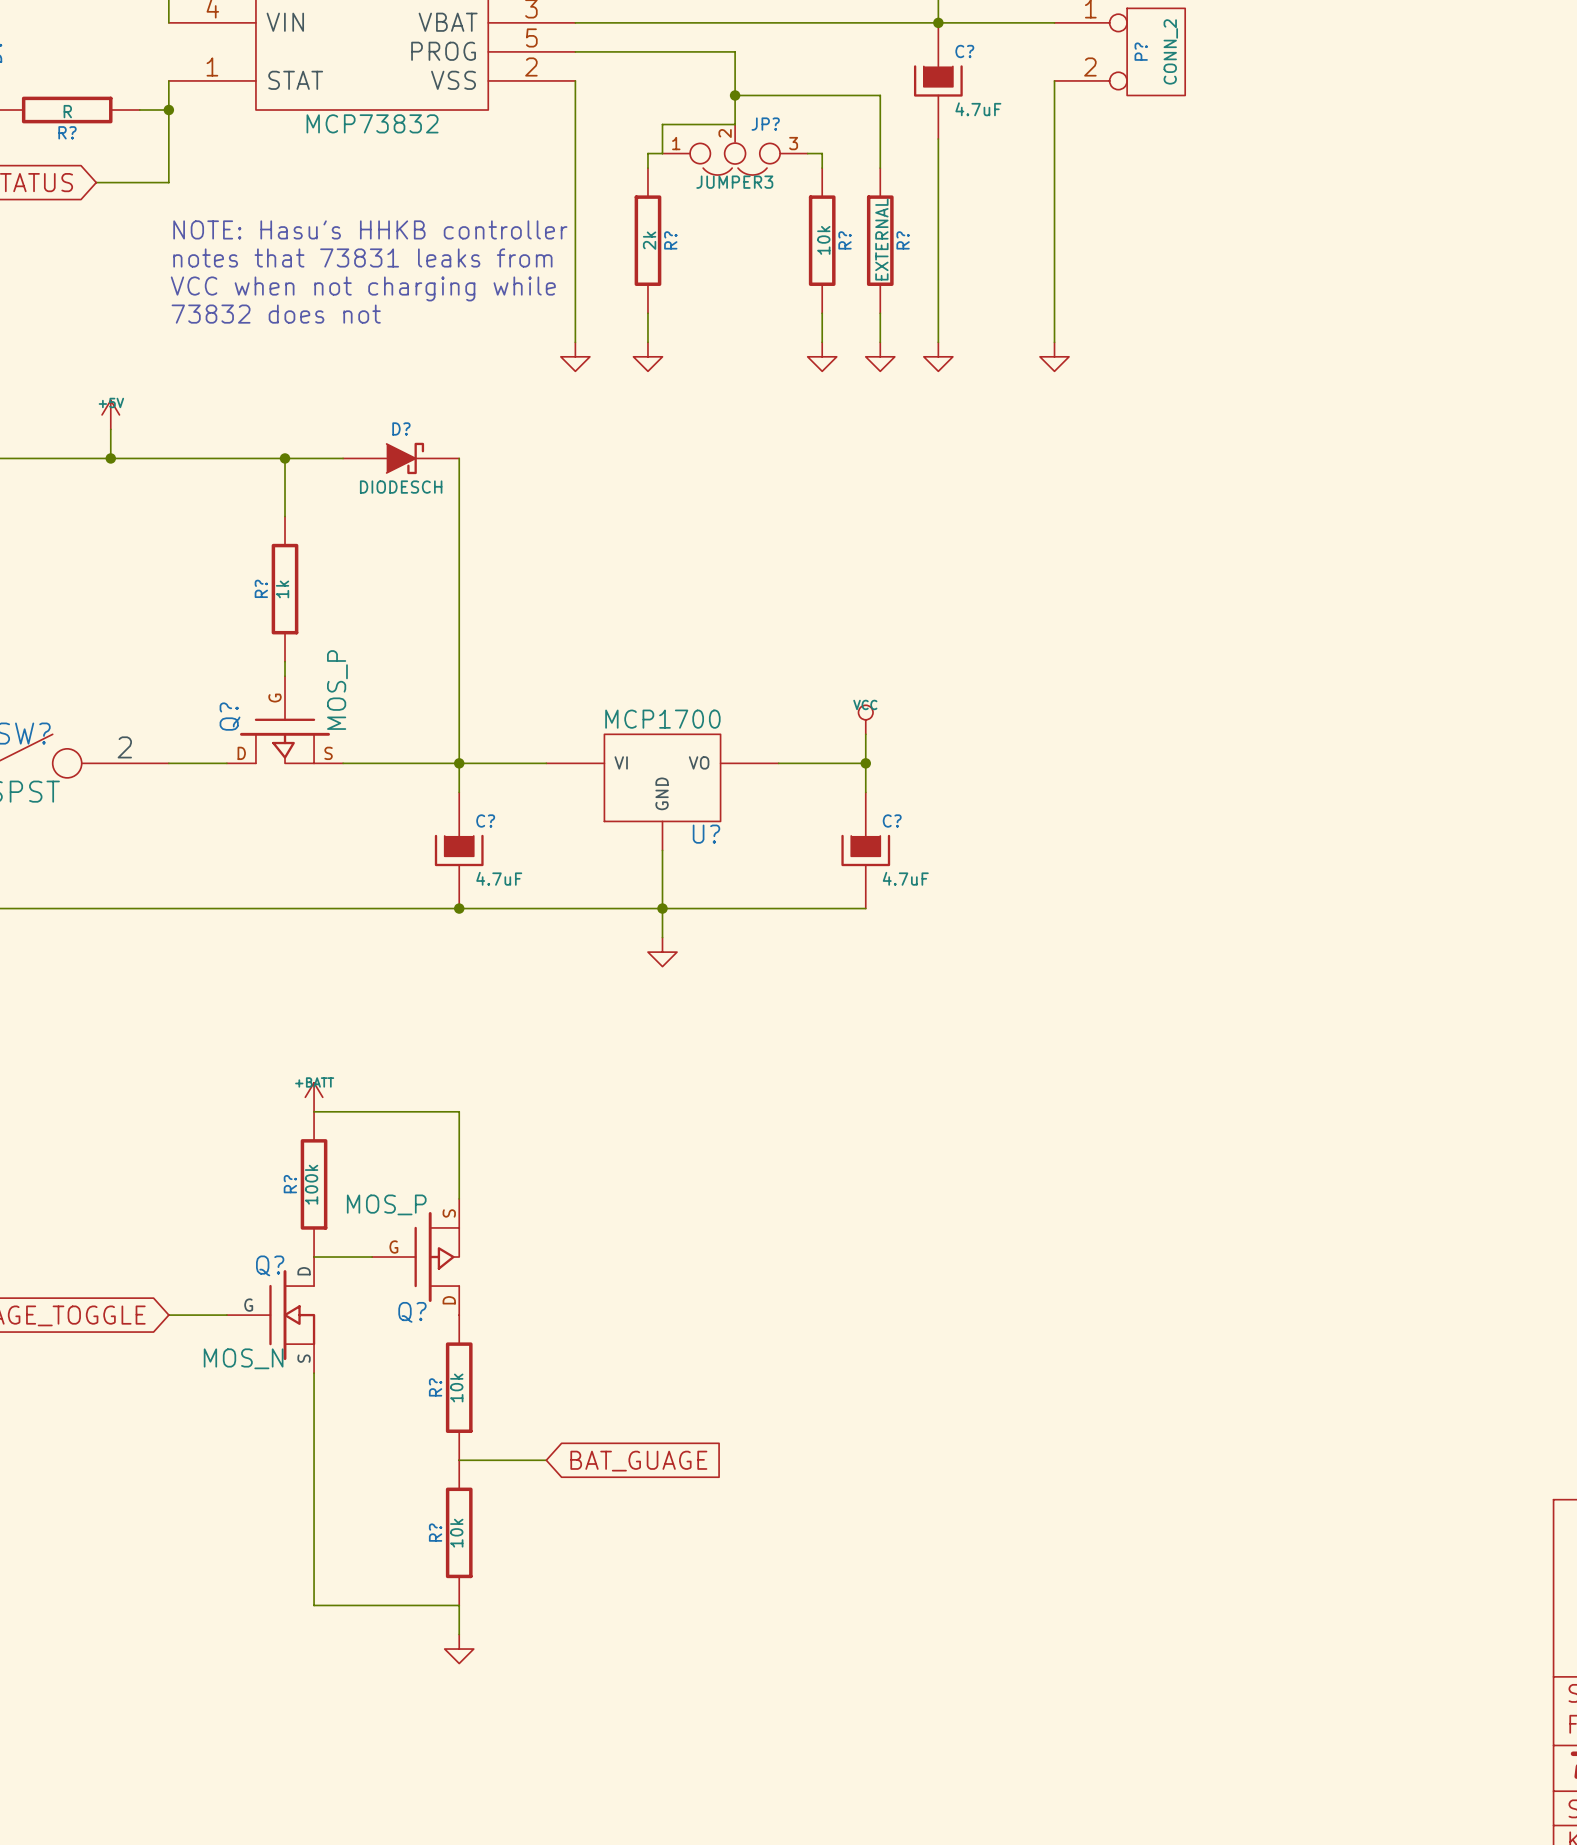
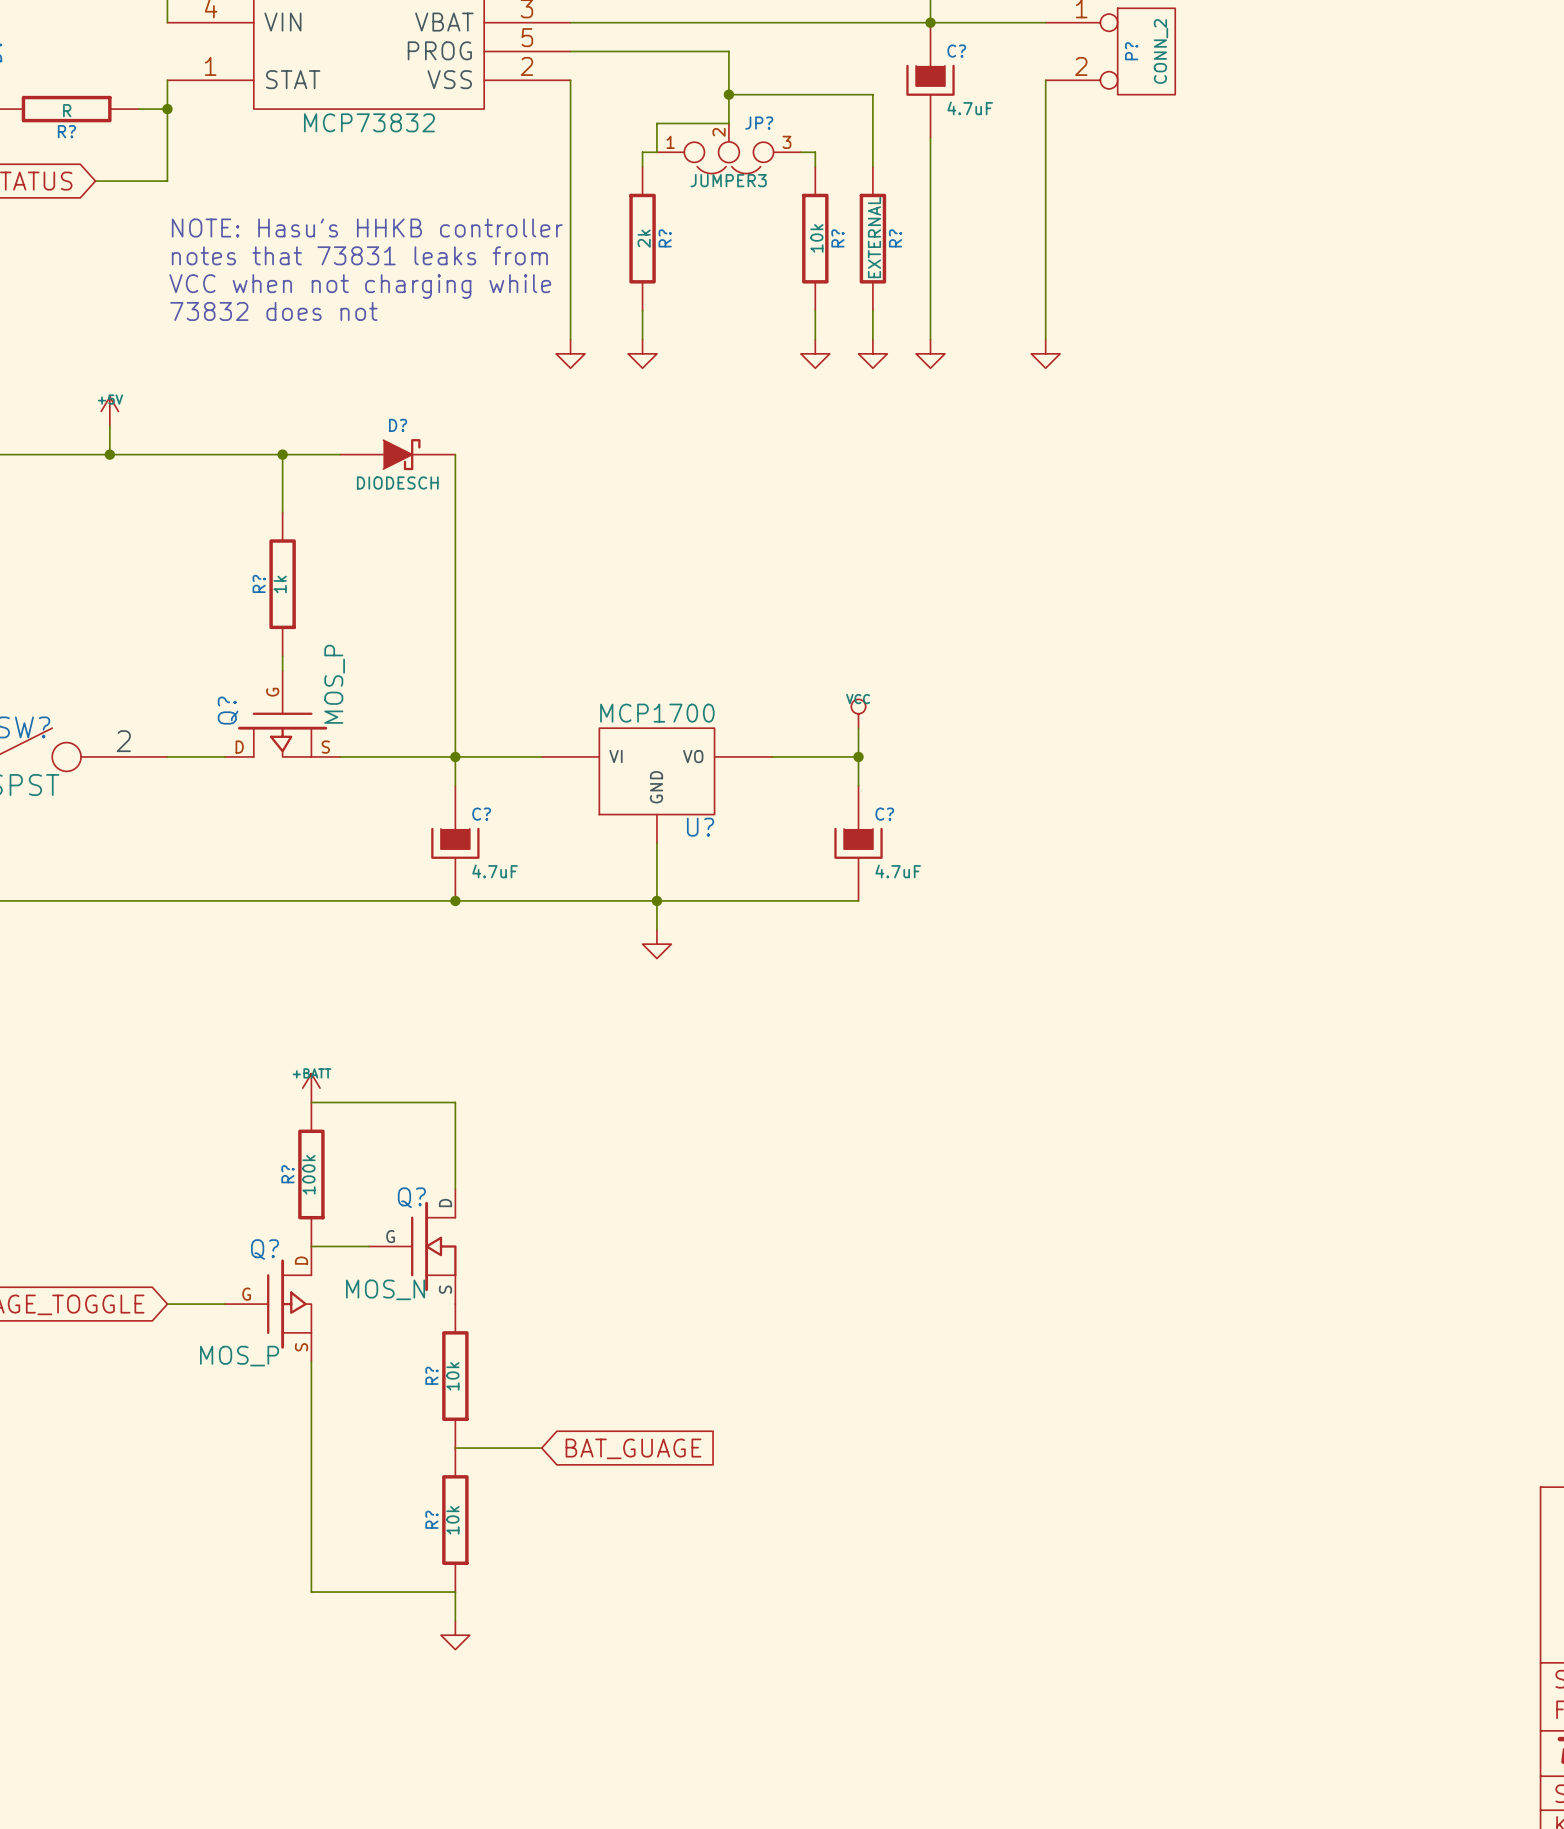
Q? symbol: [372, 1198, 460, 1316] -> [369, 1188, 457, 1305]
Q? value: MOS_P (386, 1204) -> MOS_N (385, 1289)
Q? symbol: [226, 1257, 316, 1374] -> [225, 1246, 312, 1362]
Q? name position: Q? (412, 1312) -> Q? (411, 1197)
Q? value: MOS_N (243, 1358) -> MOS_P (239, 1356)

